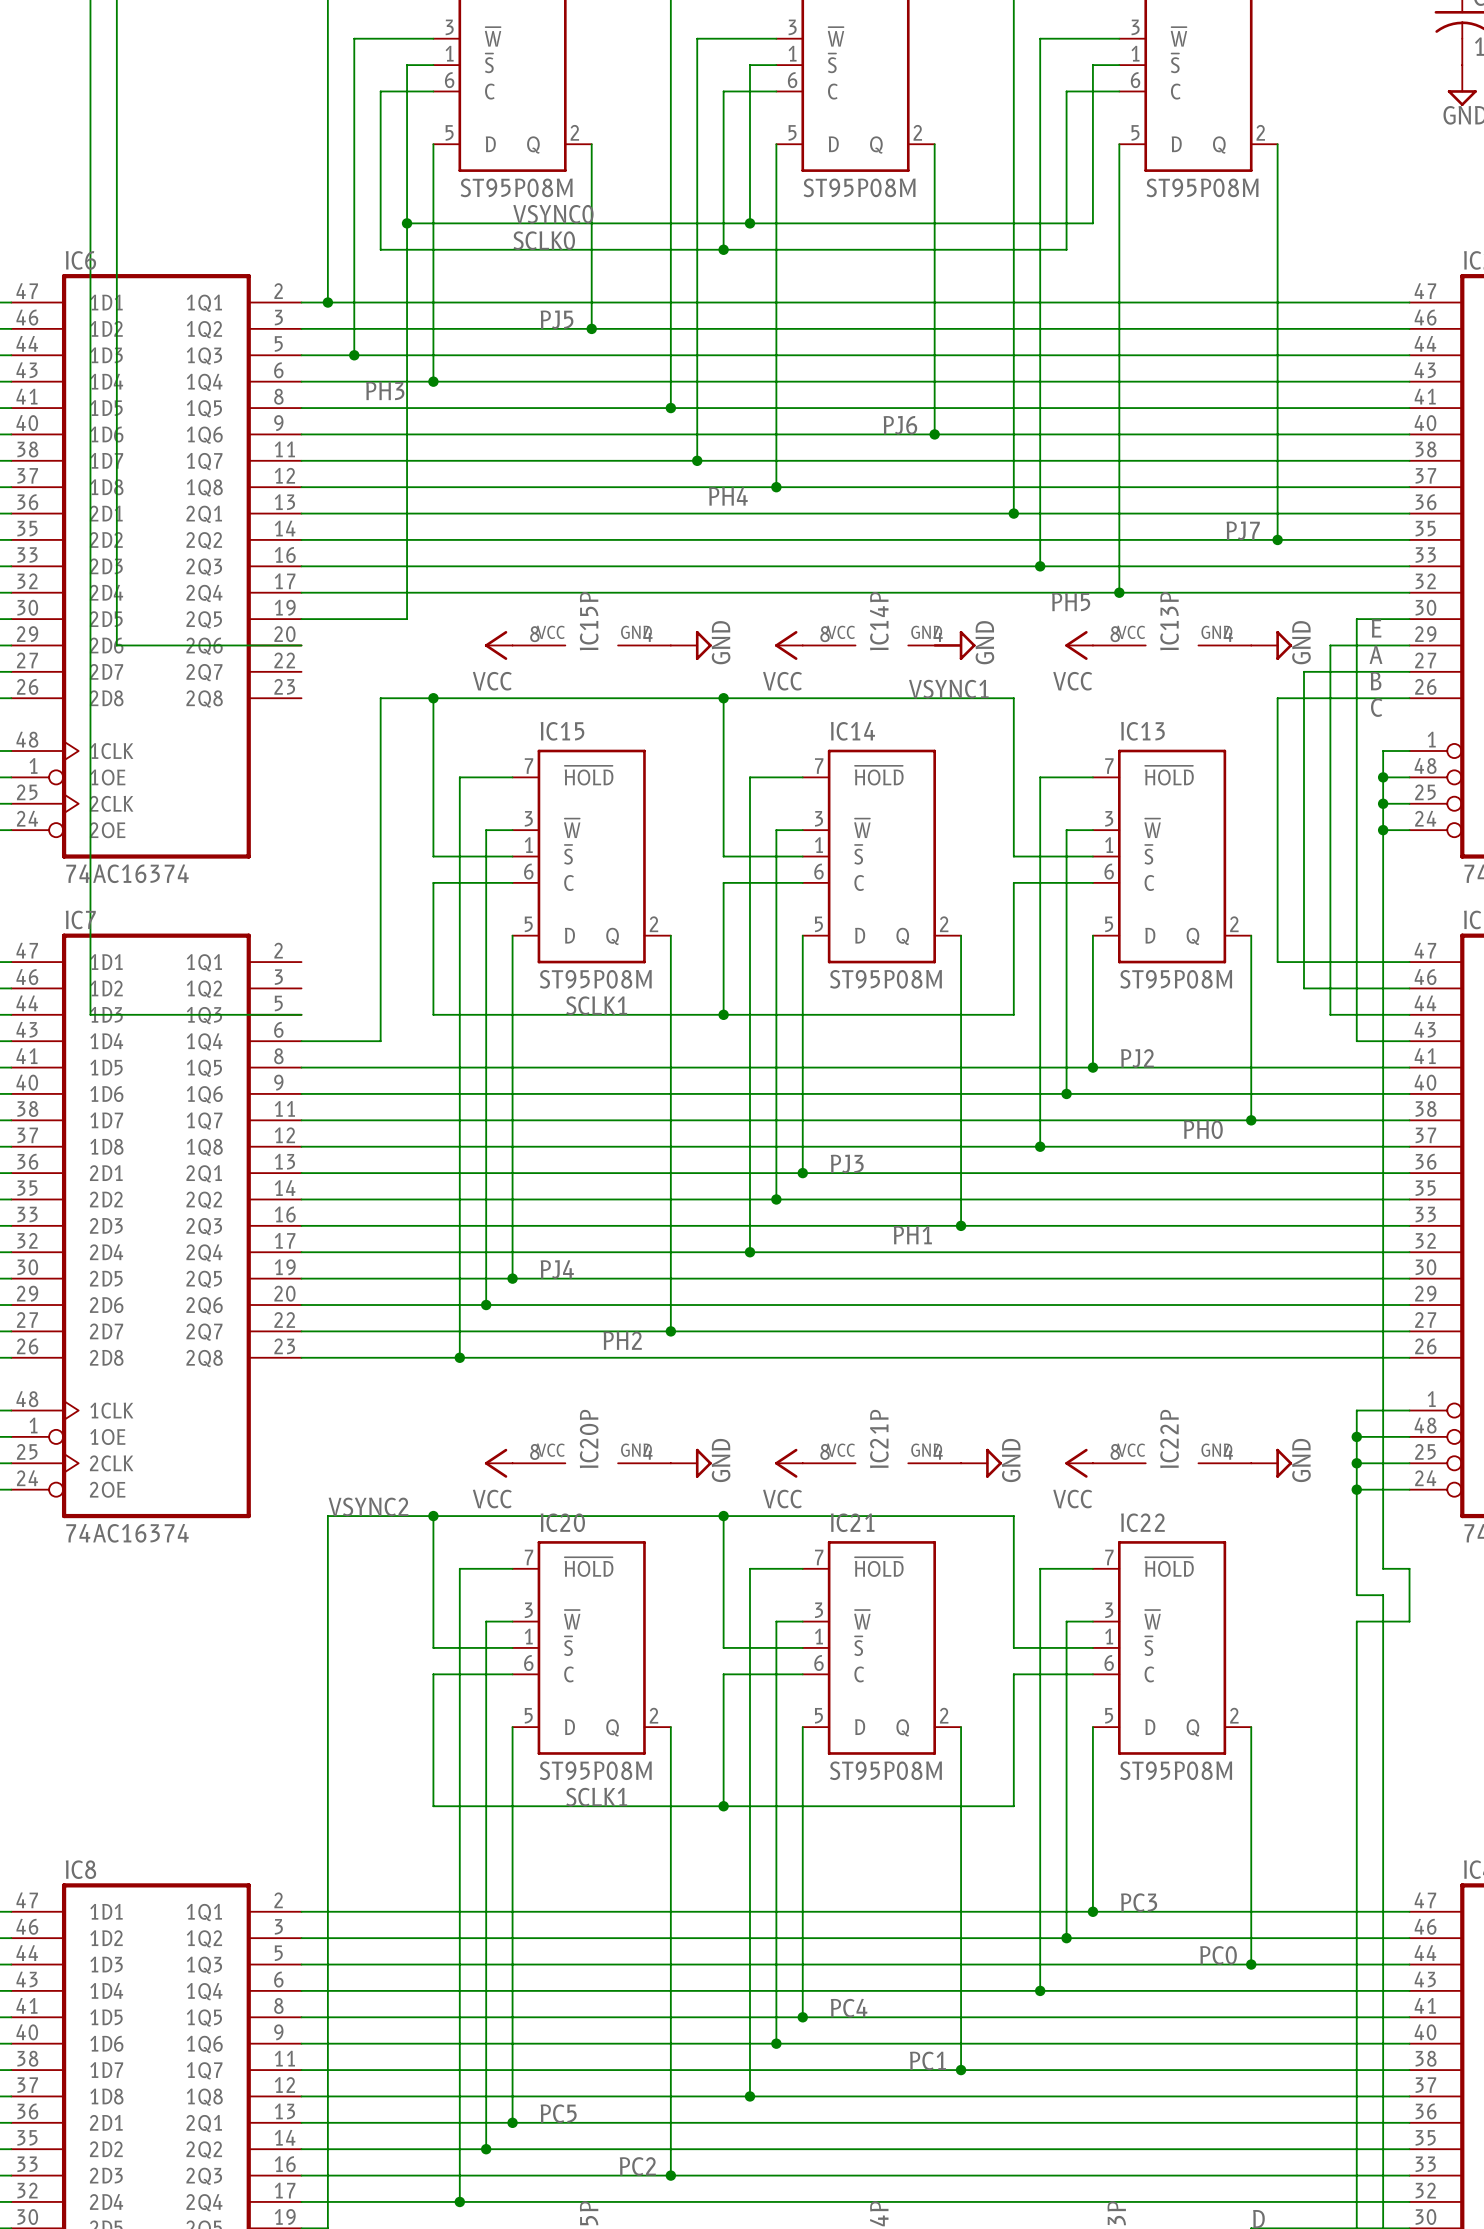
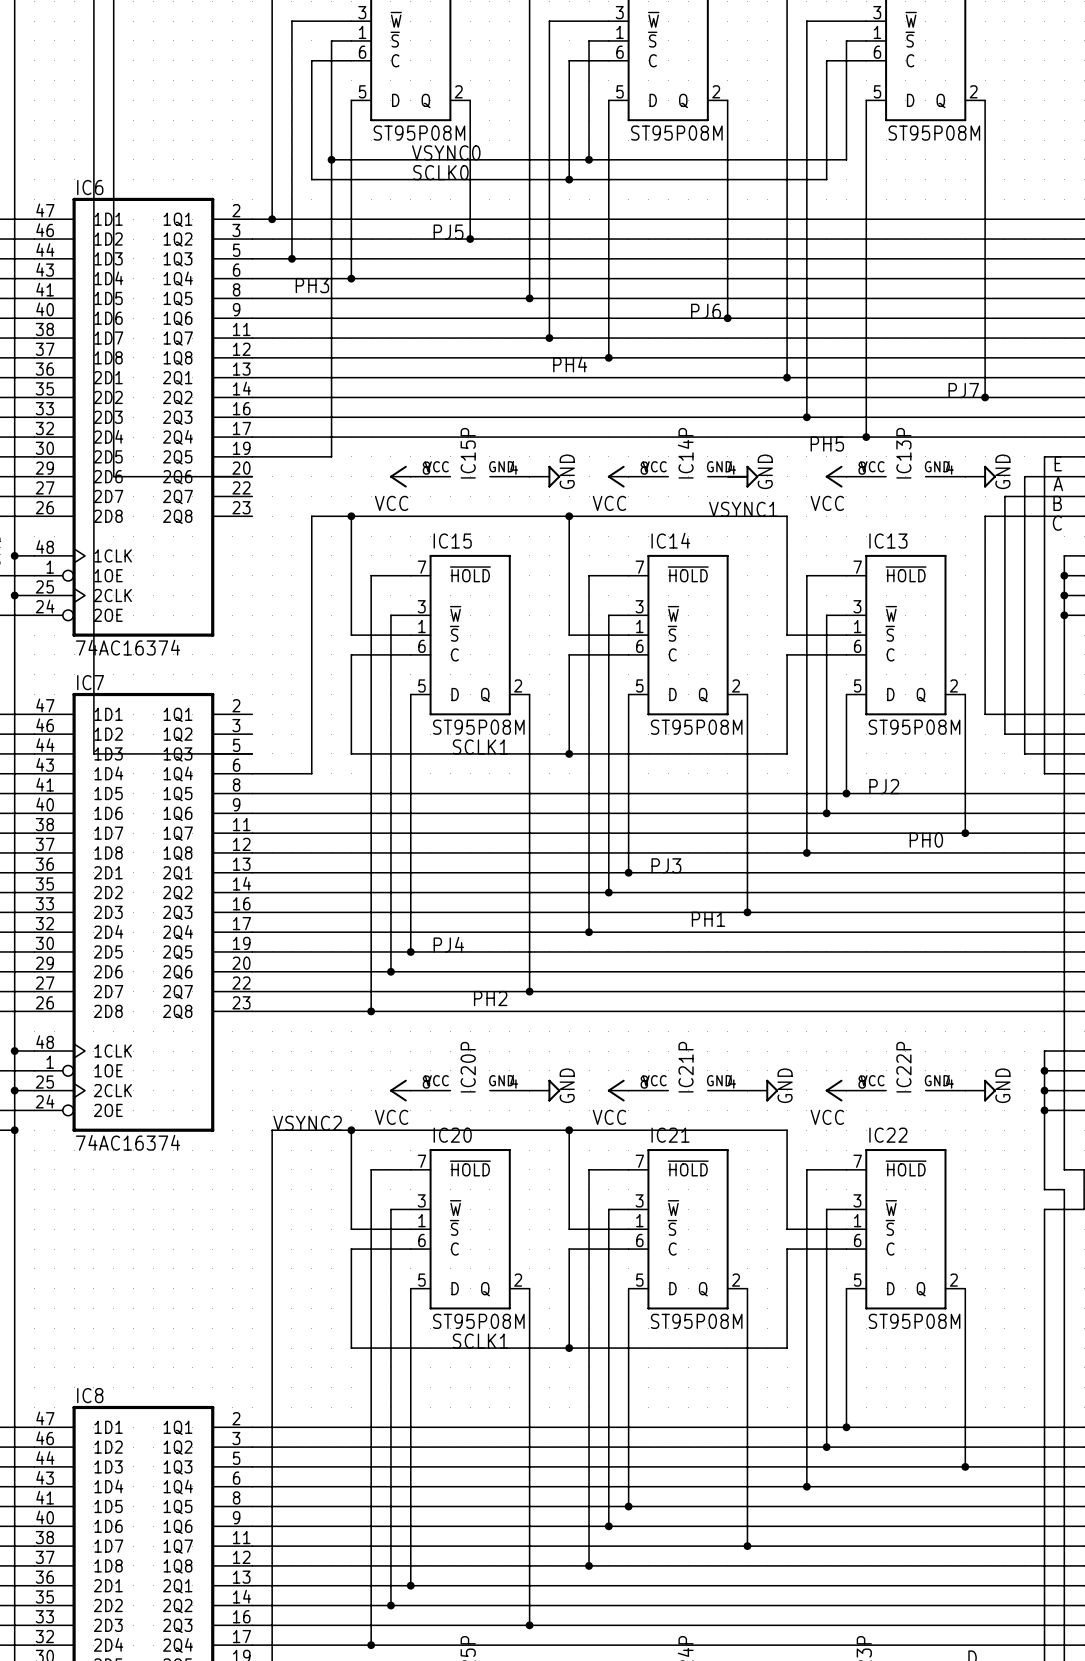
label: PC3 (1139, 1902) -> none
label: PC0 (1218, 1955) -> none
label: PC4 (849, 2008) -> none
label: PC1 (927, 2060) -> none
label: PC5 (558, 2113) -> none
label: PC2 (637, 2166) -> none

